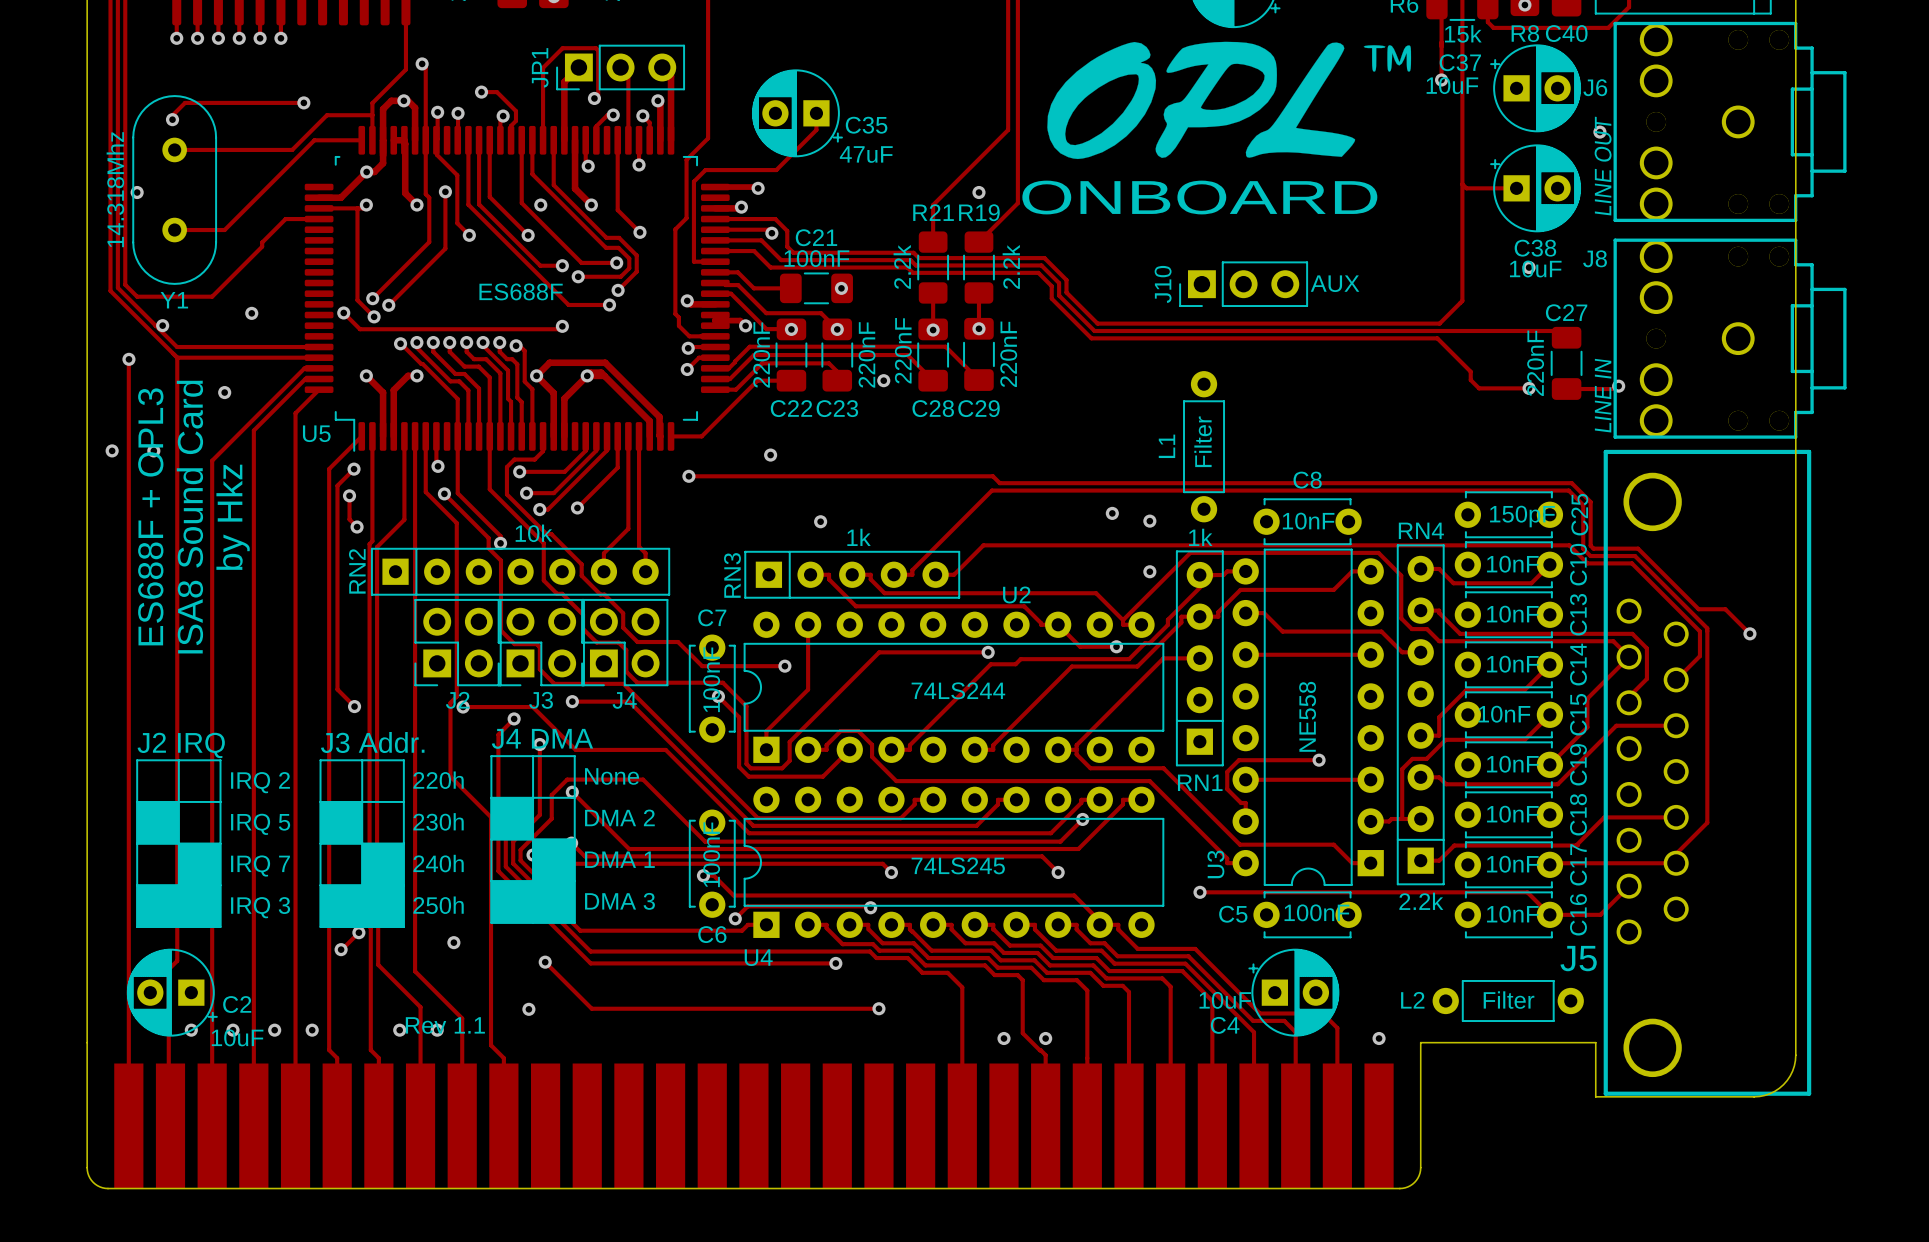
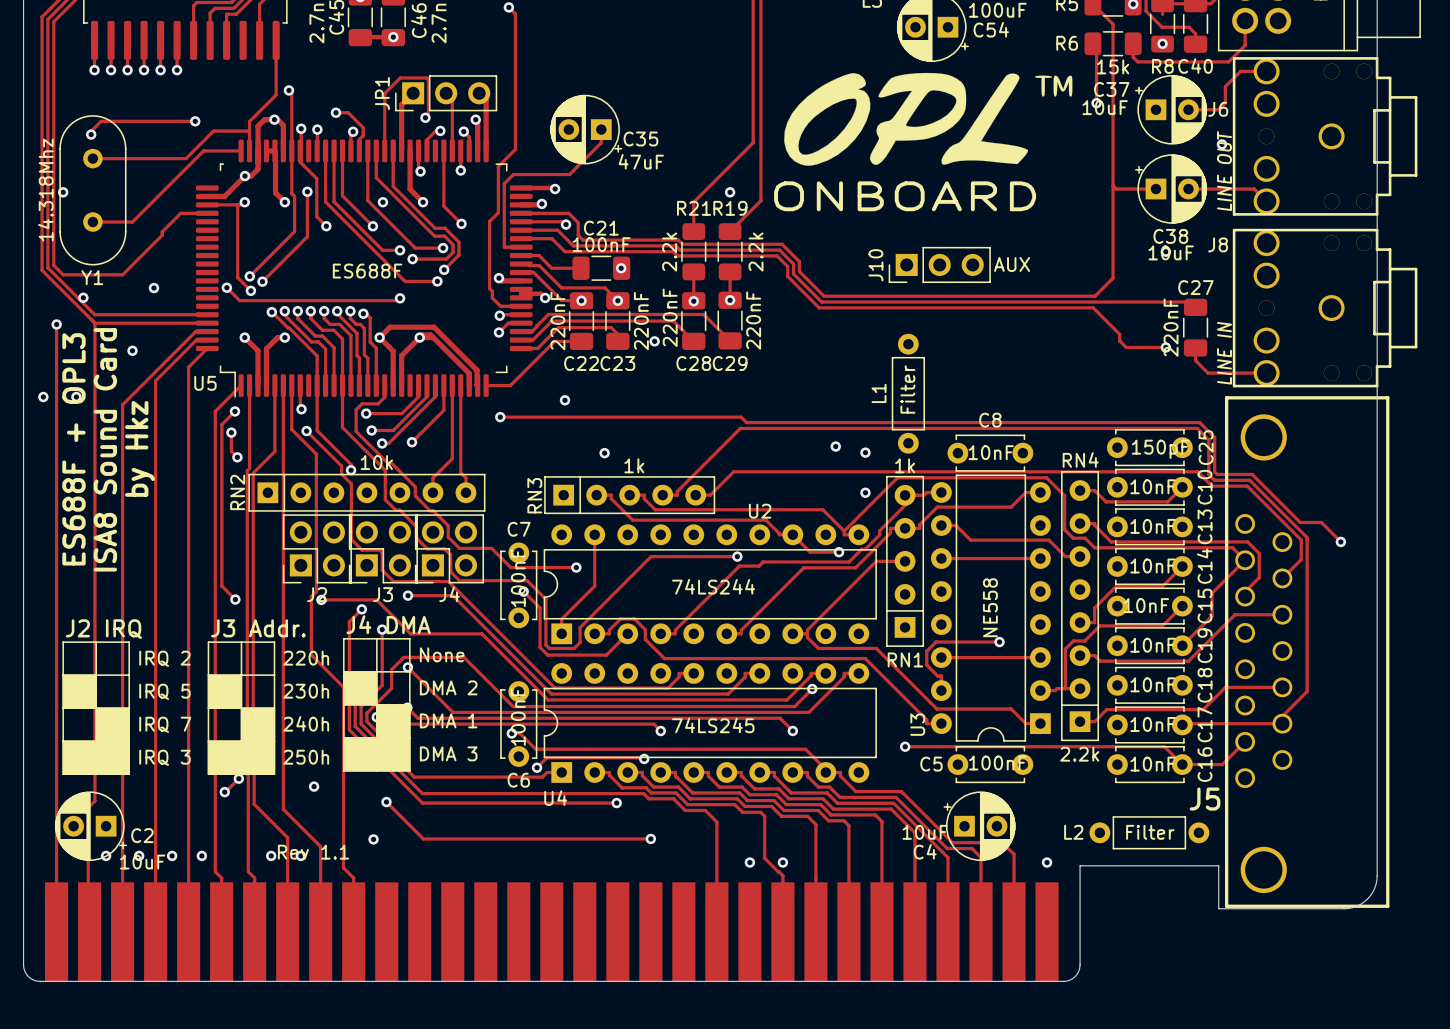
track: none -> (1266, 71) (1240, 71) (1225, 86) (1225, 103) (1218, 109) (1188, 109)
track: none -> (1188, 189) (1254, 189) (1266, 201)
track: (1618, 386) (1615, 389) (1566, 389) -> (1266, 373) (1207, 373) (1195, 360) (1195, 347)
via: (1618, 386) -> none

